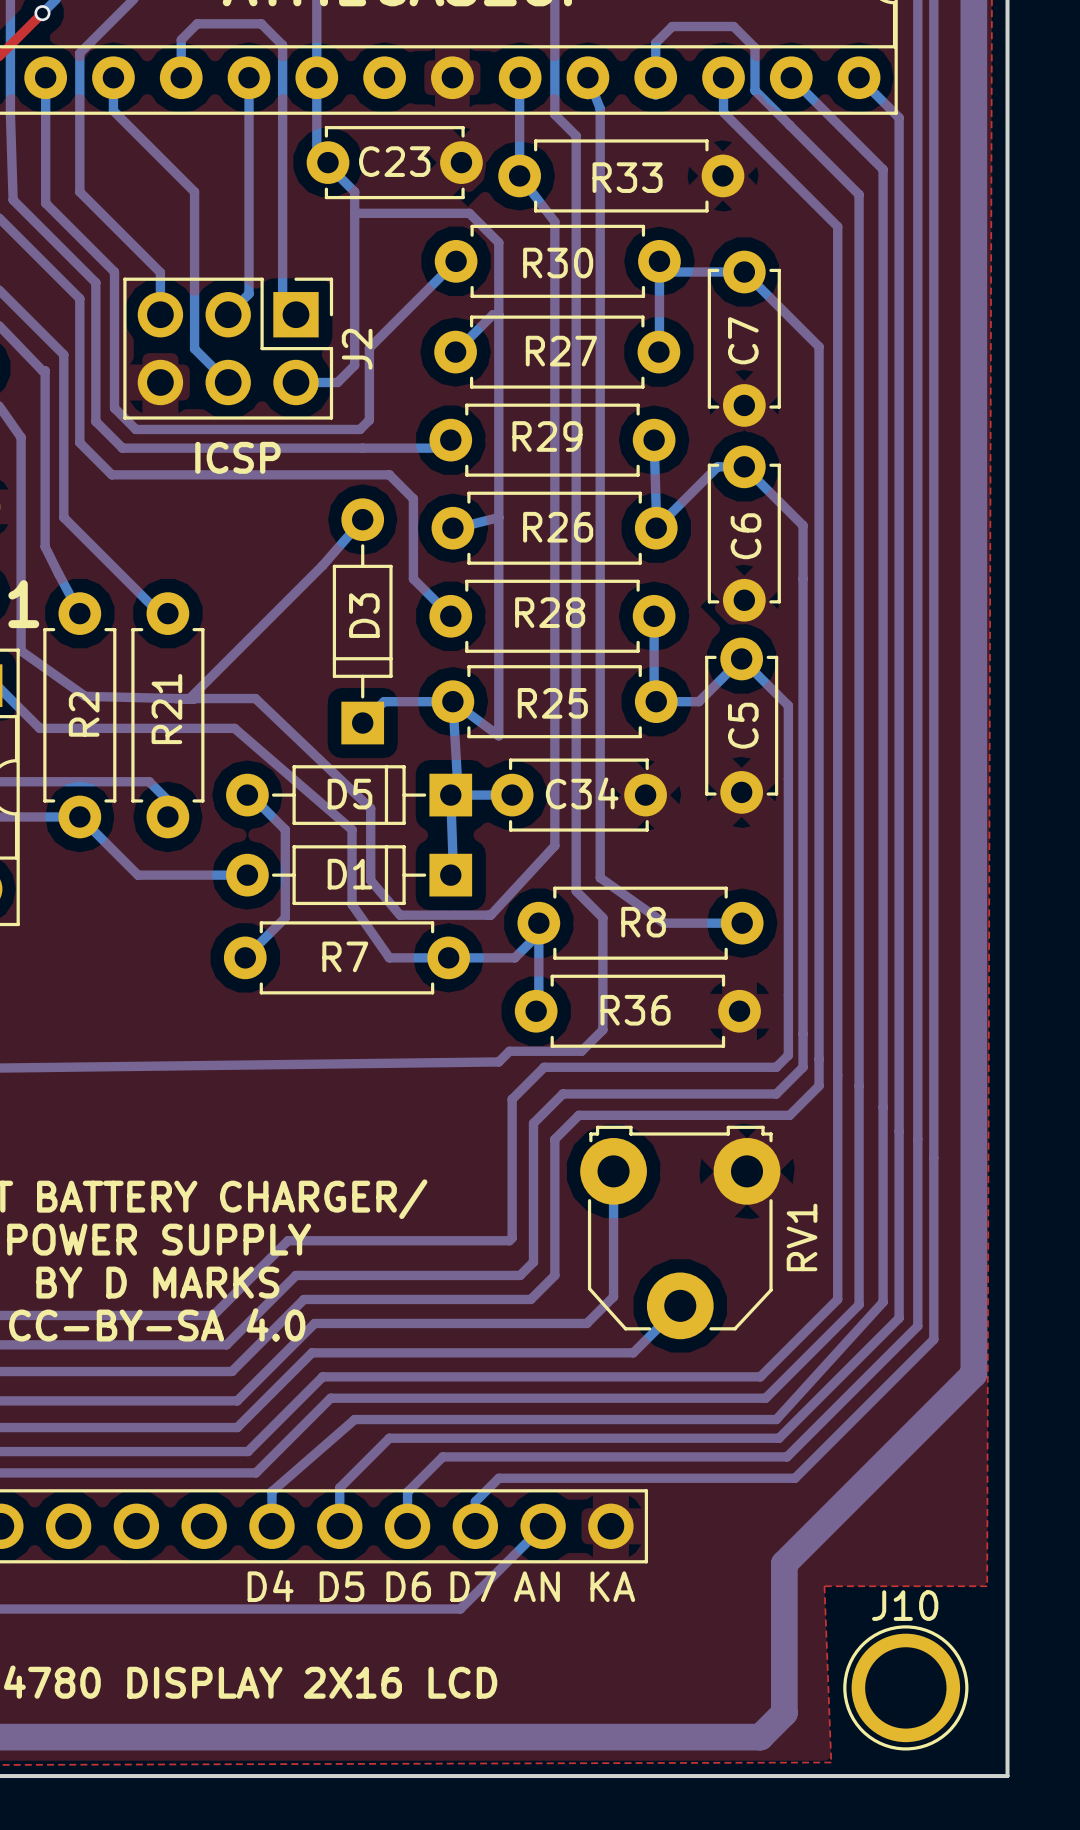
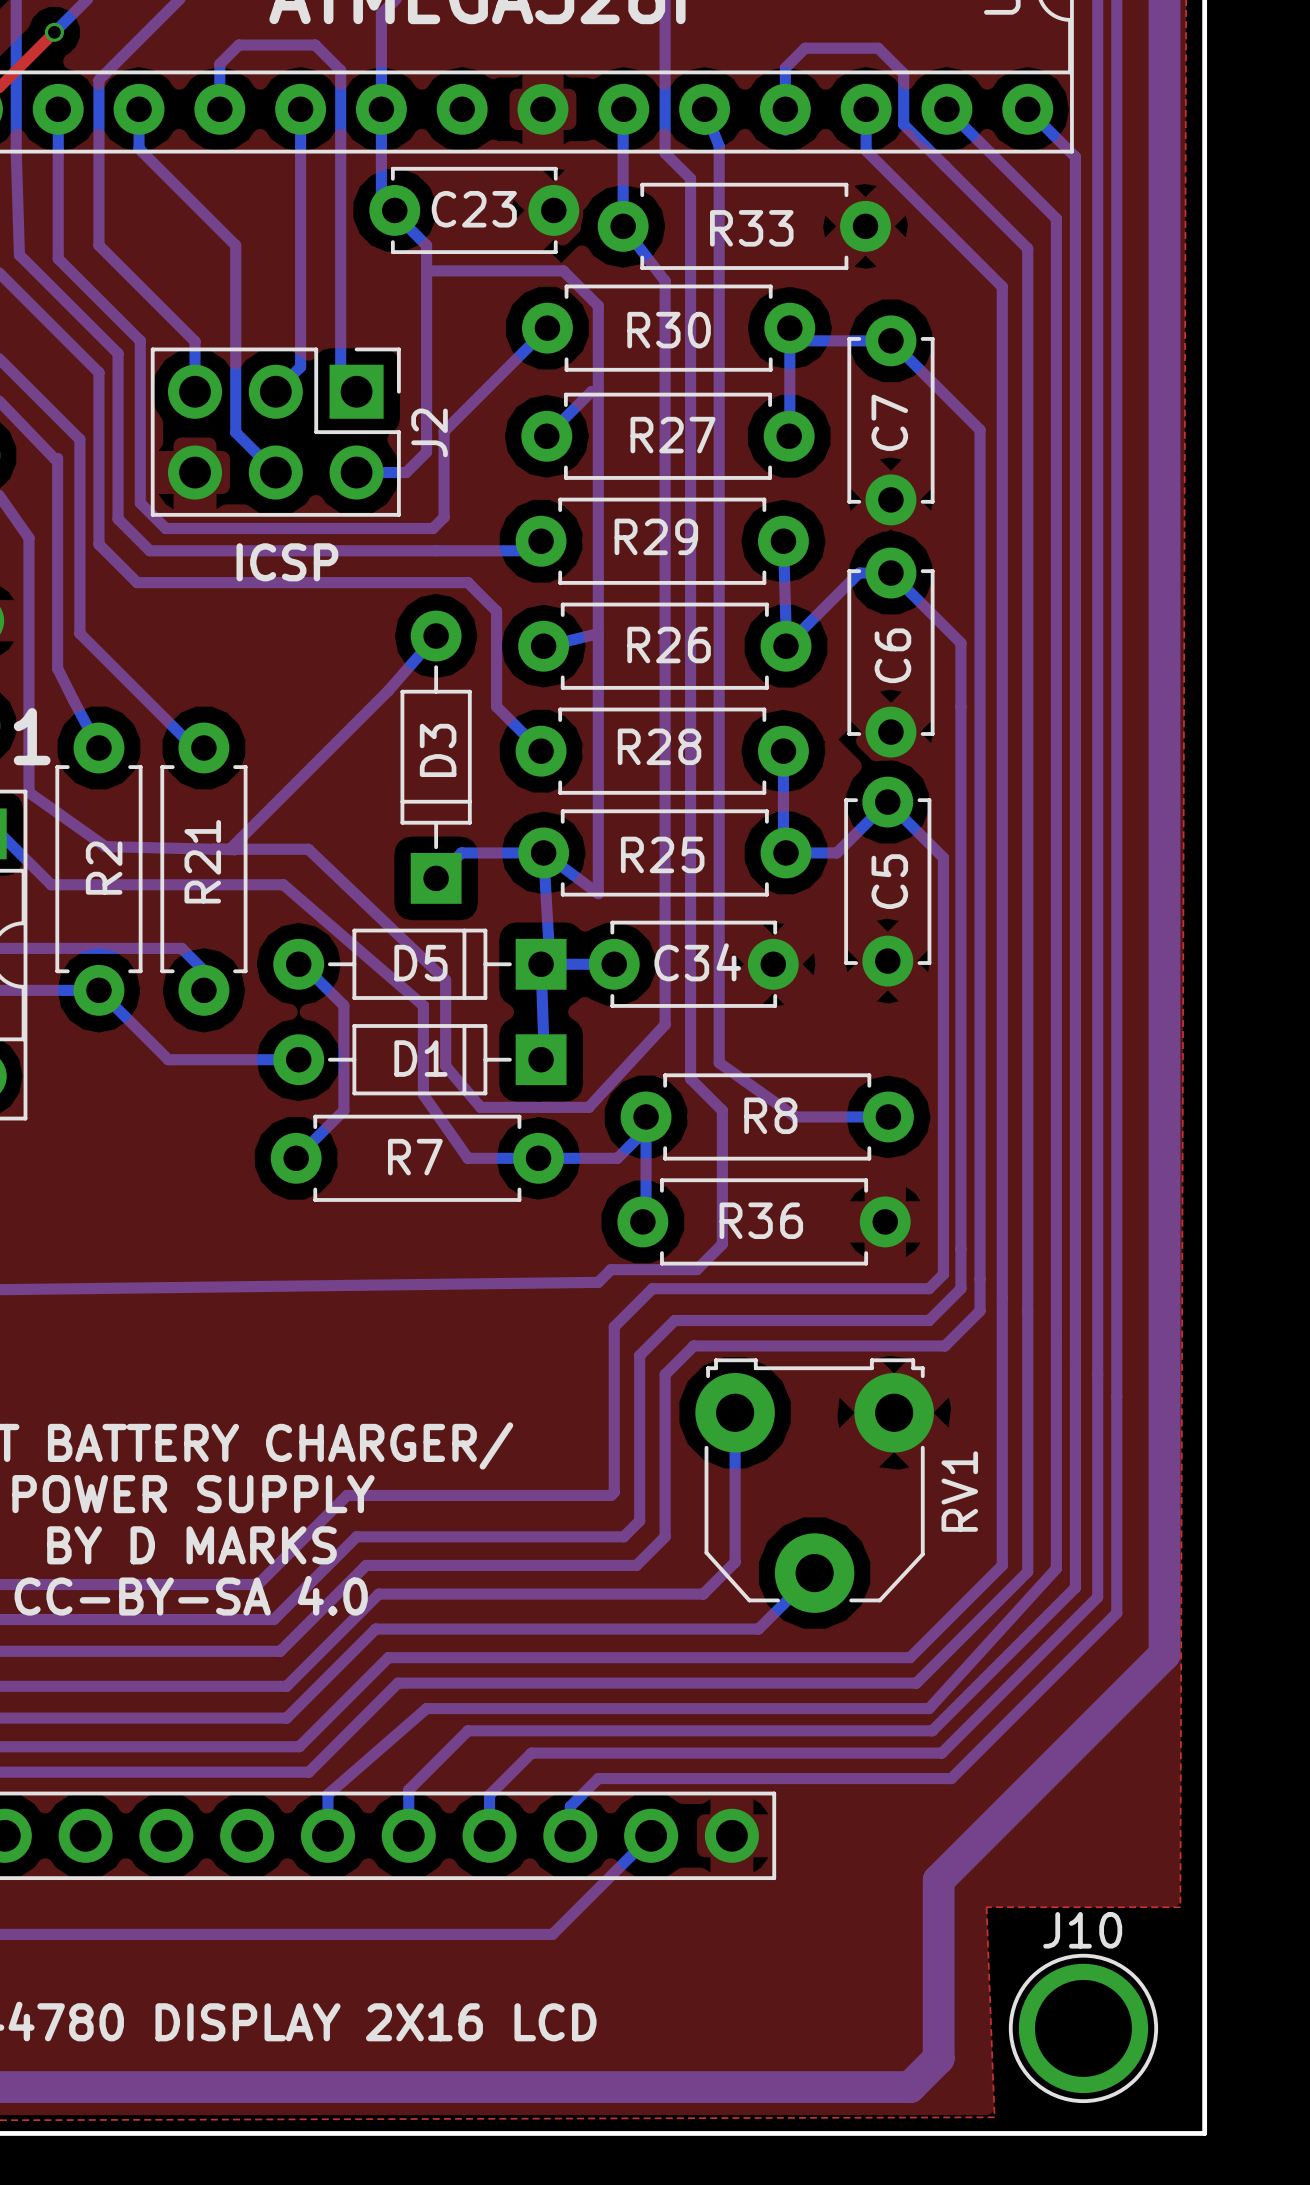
text: D4 (270, 1586) -> none
text: D5 (341, 1586) -> none
text: D6 (408, 1586) -> none
text: D7 (473, 1586) -> none
text: AN (536, 1586) -> none
text: KA (612, 1586) -> none

